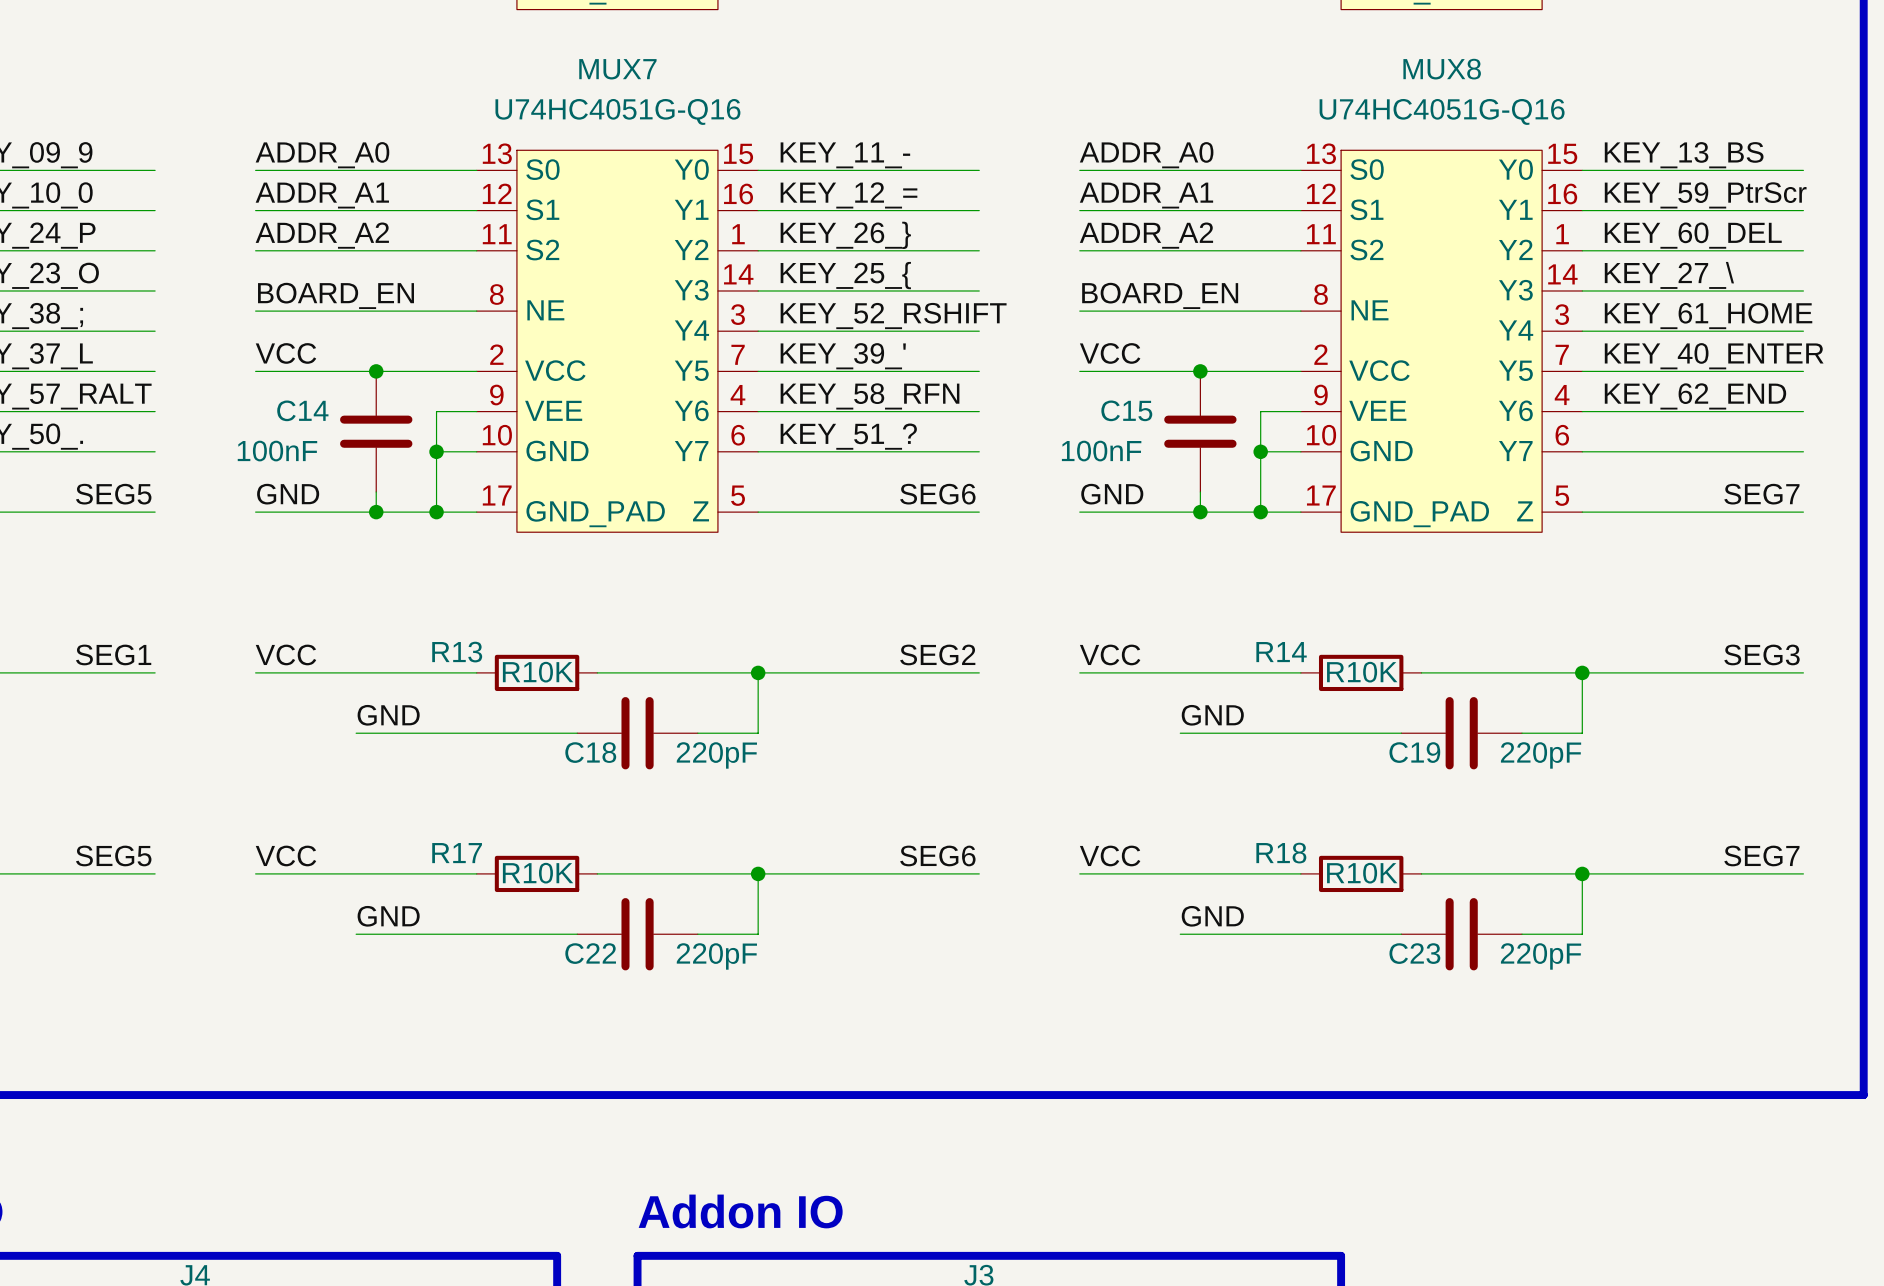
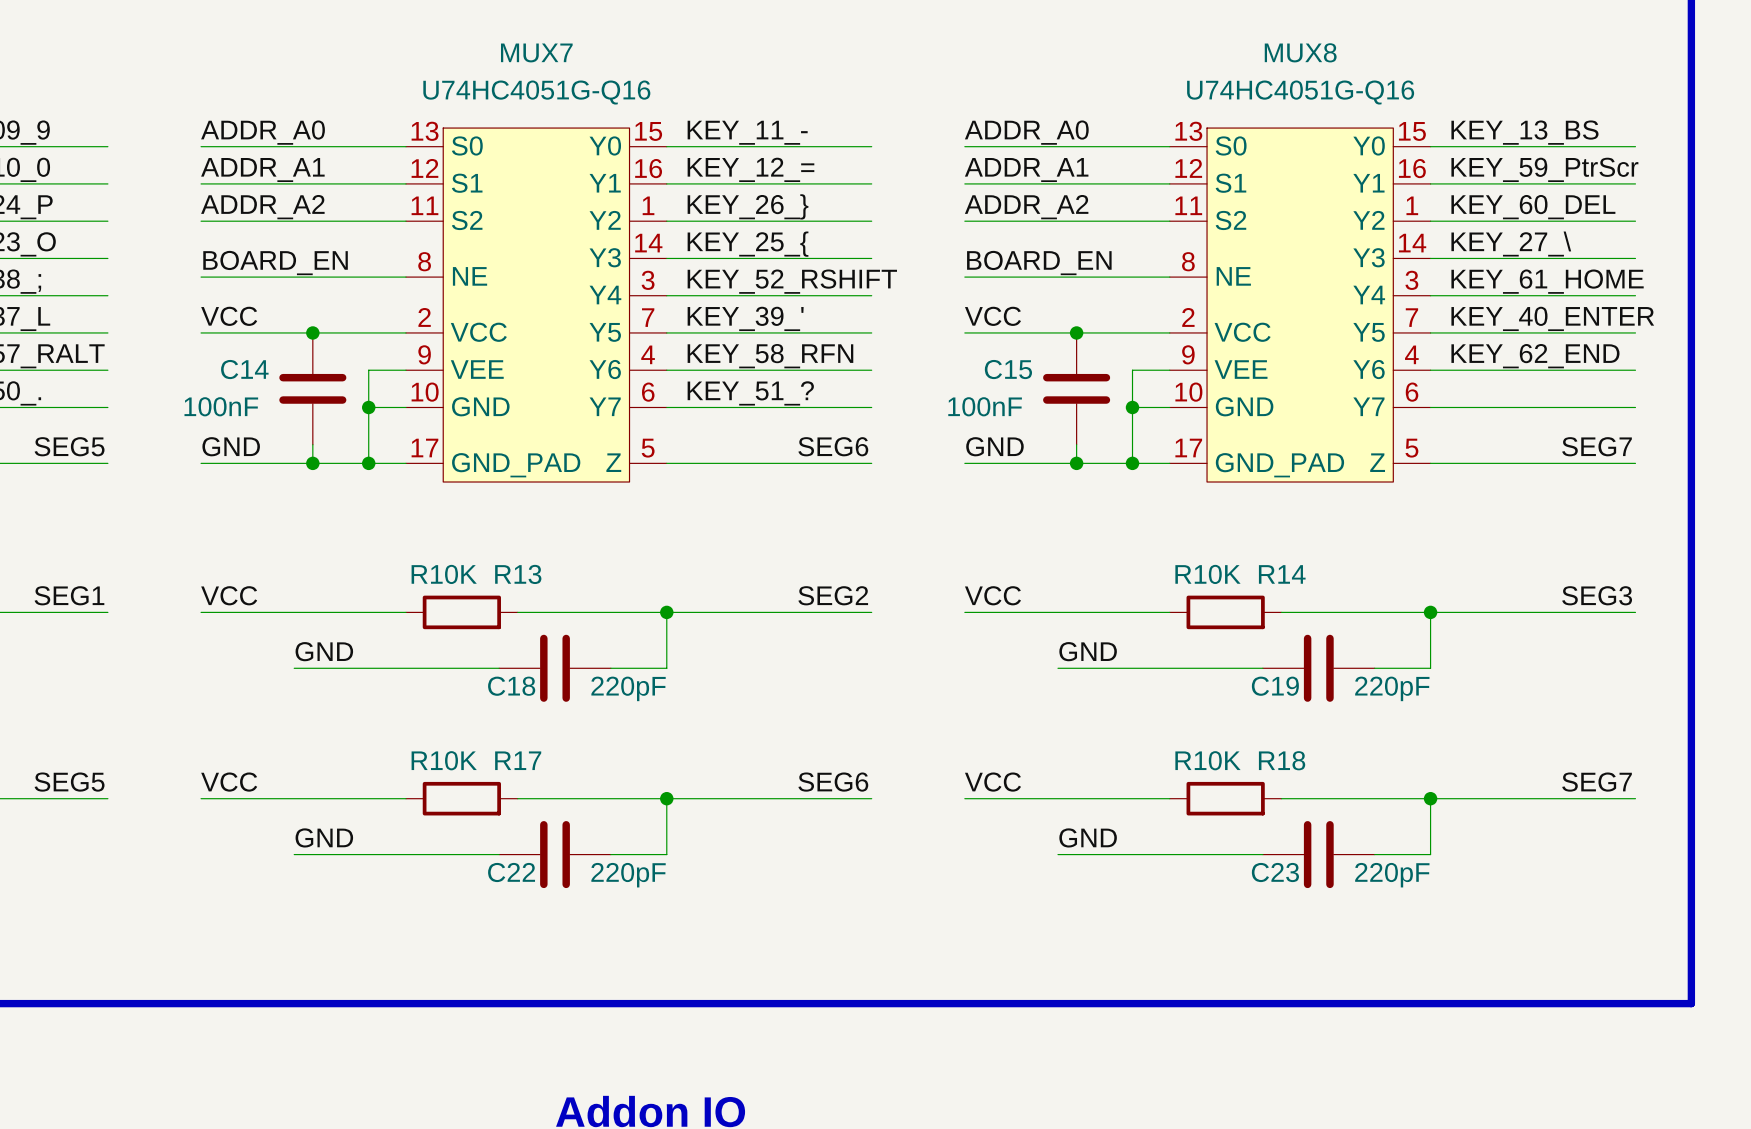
R13 name position: R13 (457, 652) -> R13 (518, 574)
R14 name position: R14 (1281, 652) -> R14 (1282, 574)
R13 value position: R10K (538, 672) -> R10K (444, 574)
R14 value position: R10K (1362, 672) -> R10K (1207, 574)
R17 name position: R17 (457, 853) -> R17 (518, 760)
R18 name position: R18 (1281, 853) -> R18 (1282, 760)
R17 value position: R10K (538, 873) -> R10K (444, 760)
R18 value position: R10K (1362, 873) -> R10K (1207, 760)

